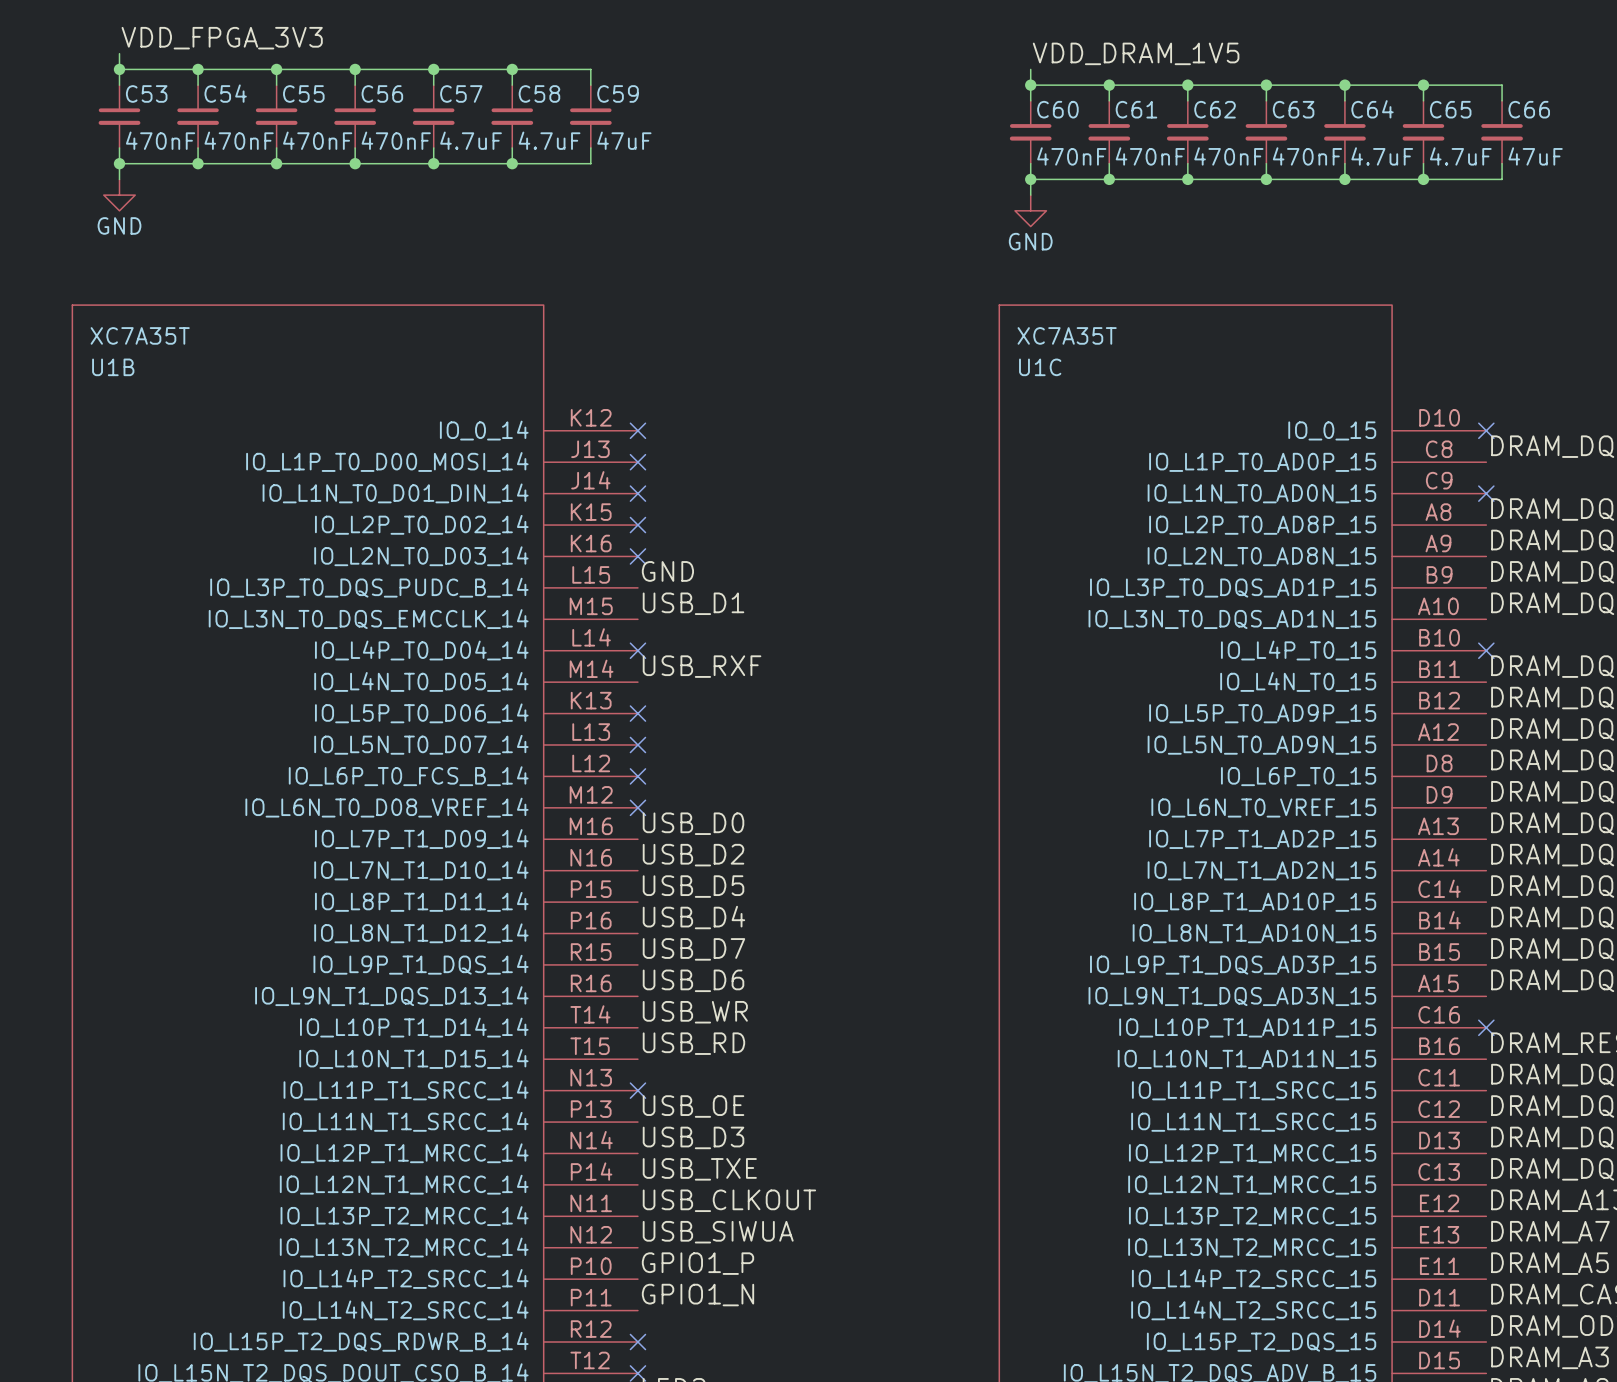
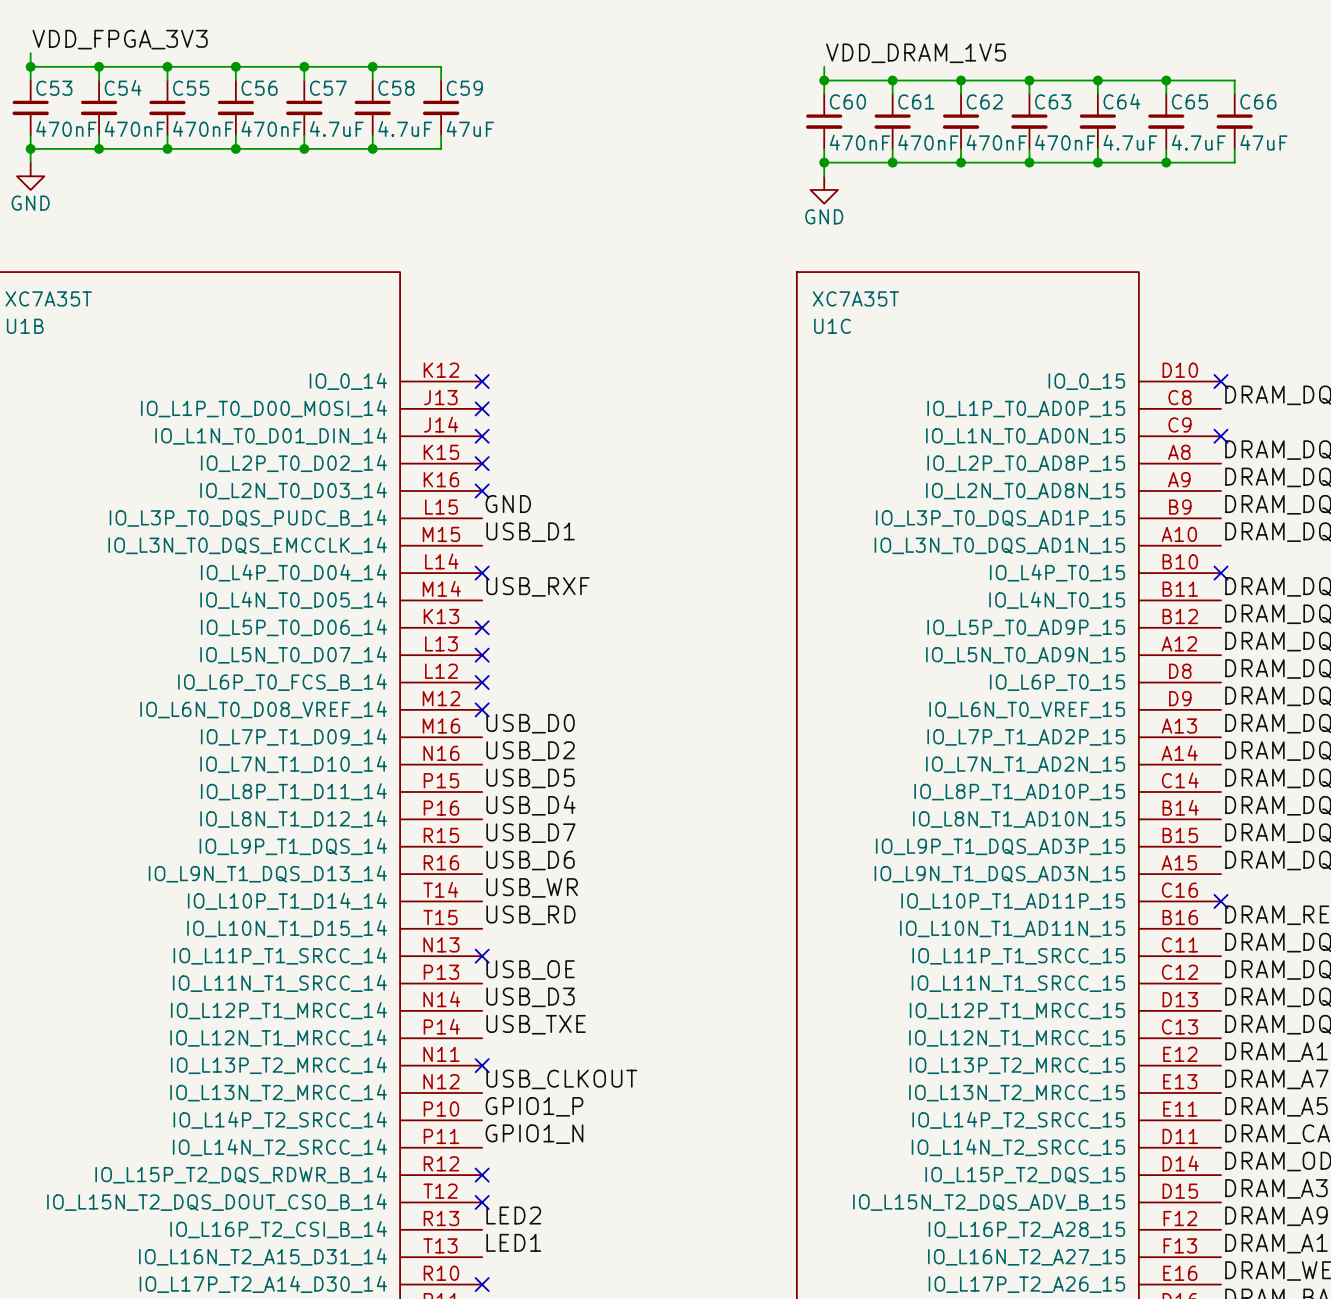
label: USB_CLKOUT (729, 1200) -> none
no-connect mark: none -> (482, 1065)
label: USB_SIWUA (718, 1232) -> USB_CLKOUT (561, 1079)

